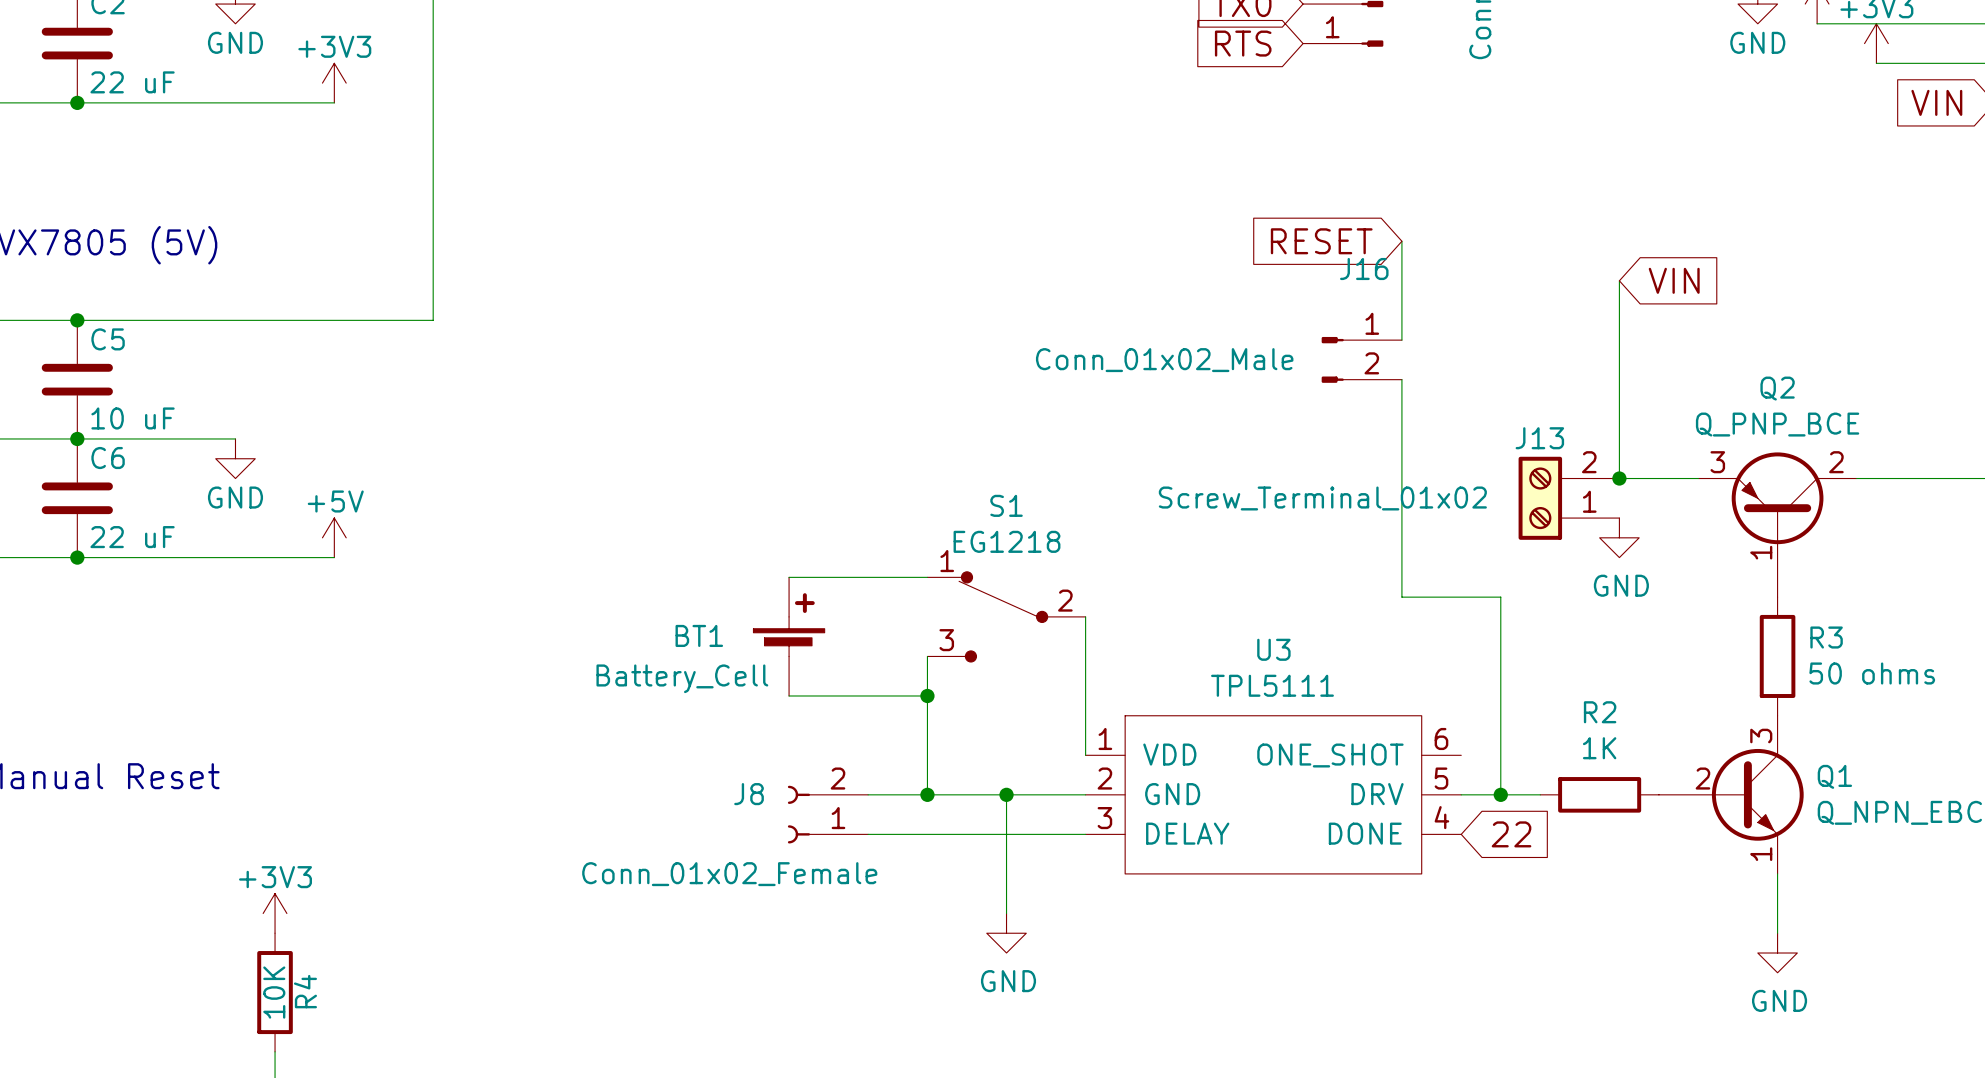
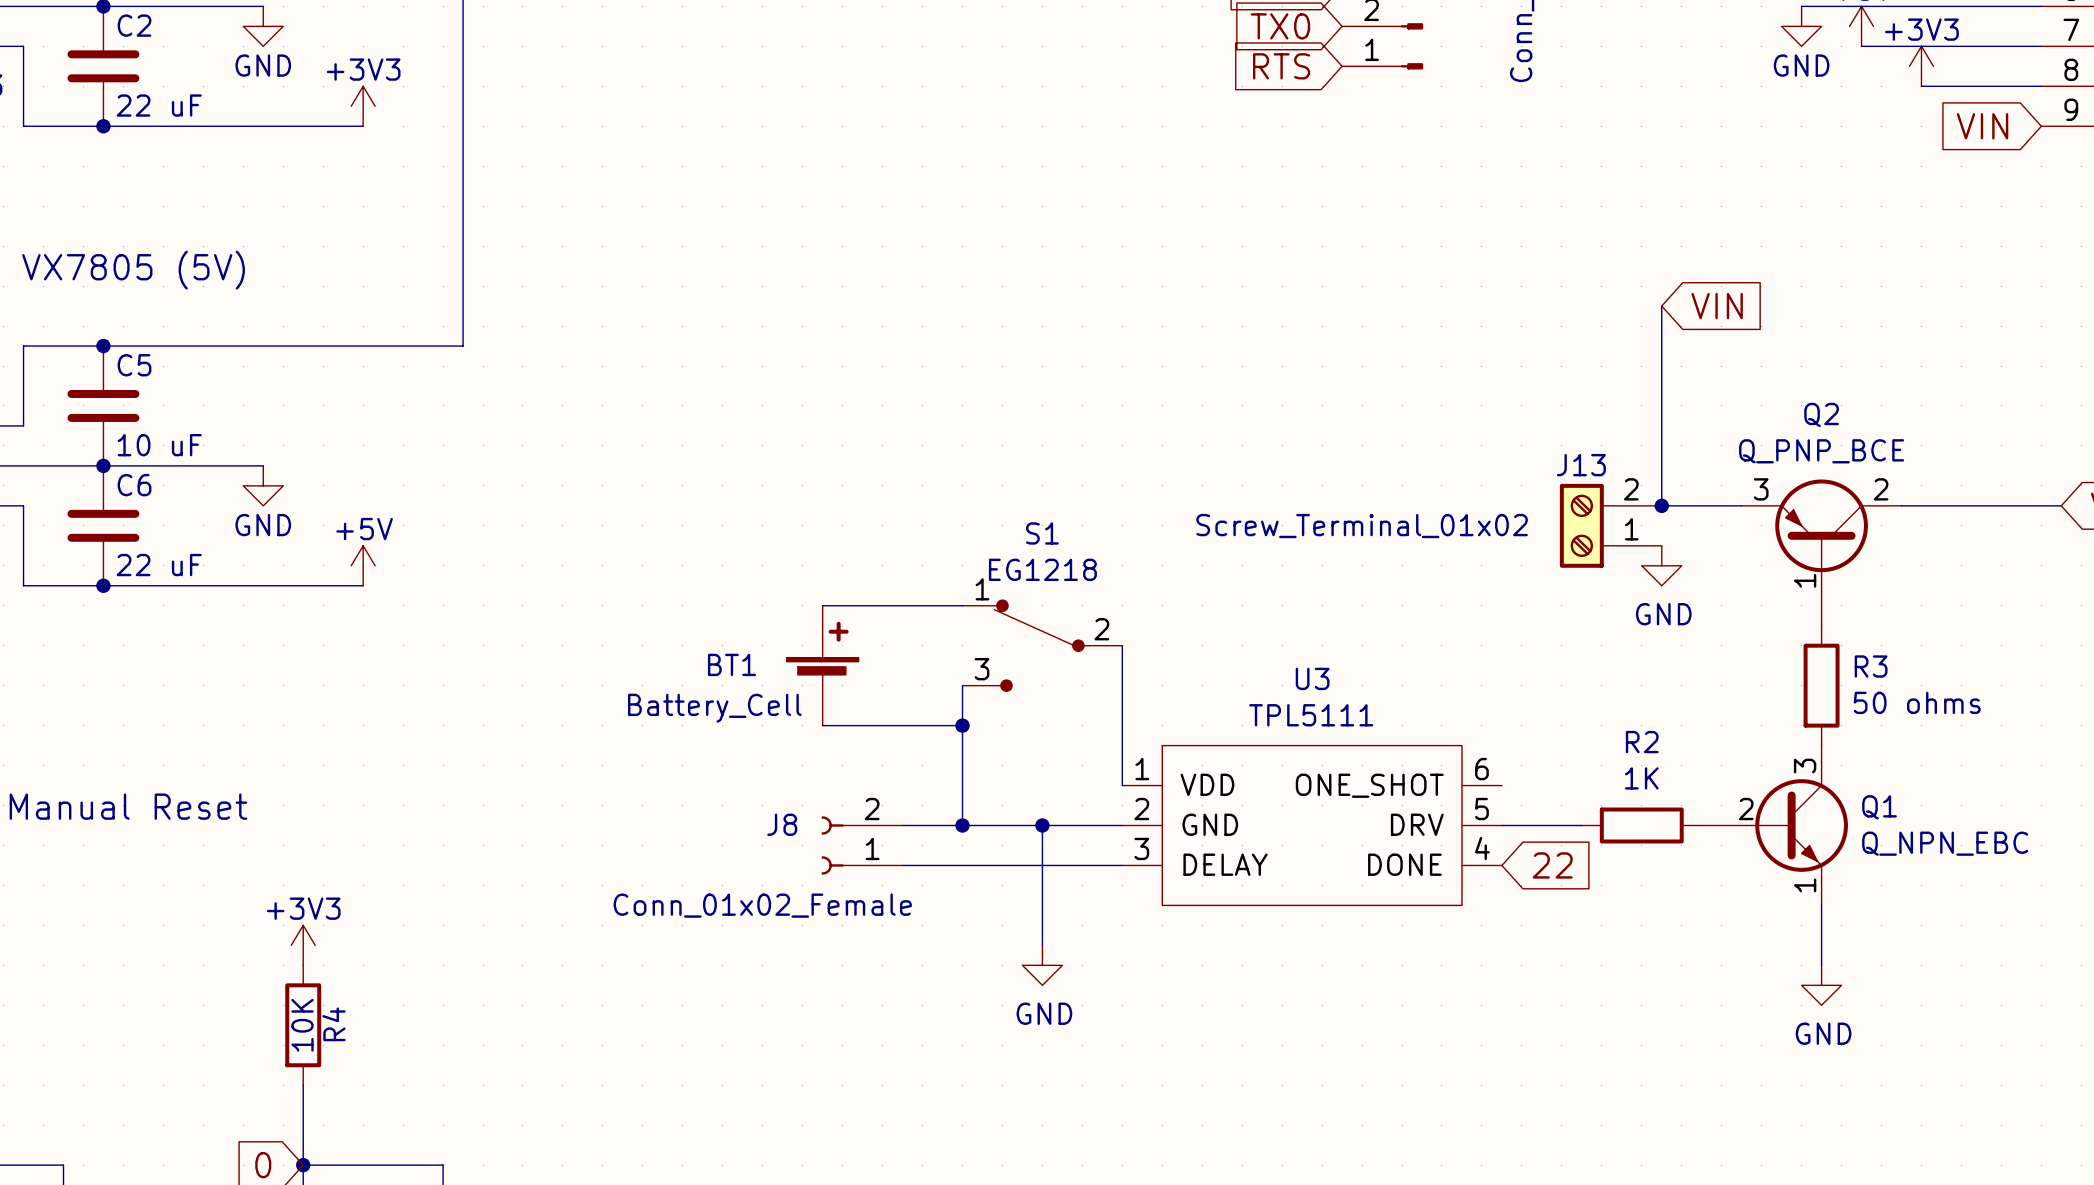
global label: RESET (1321, 241) -> none
wire: (1401, 241) (1401, 340) -> none
J16: Conn_01x02_Male (1361, 359) -> none
wire: (1401, 379) (1401, 597) (1500, 597) (1500, 794) -> none
junction: (1500, 794) -> none

